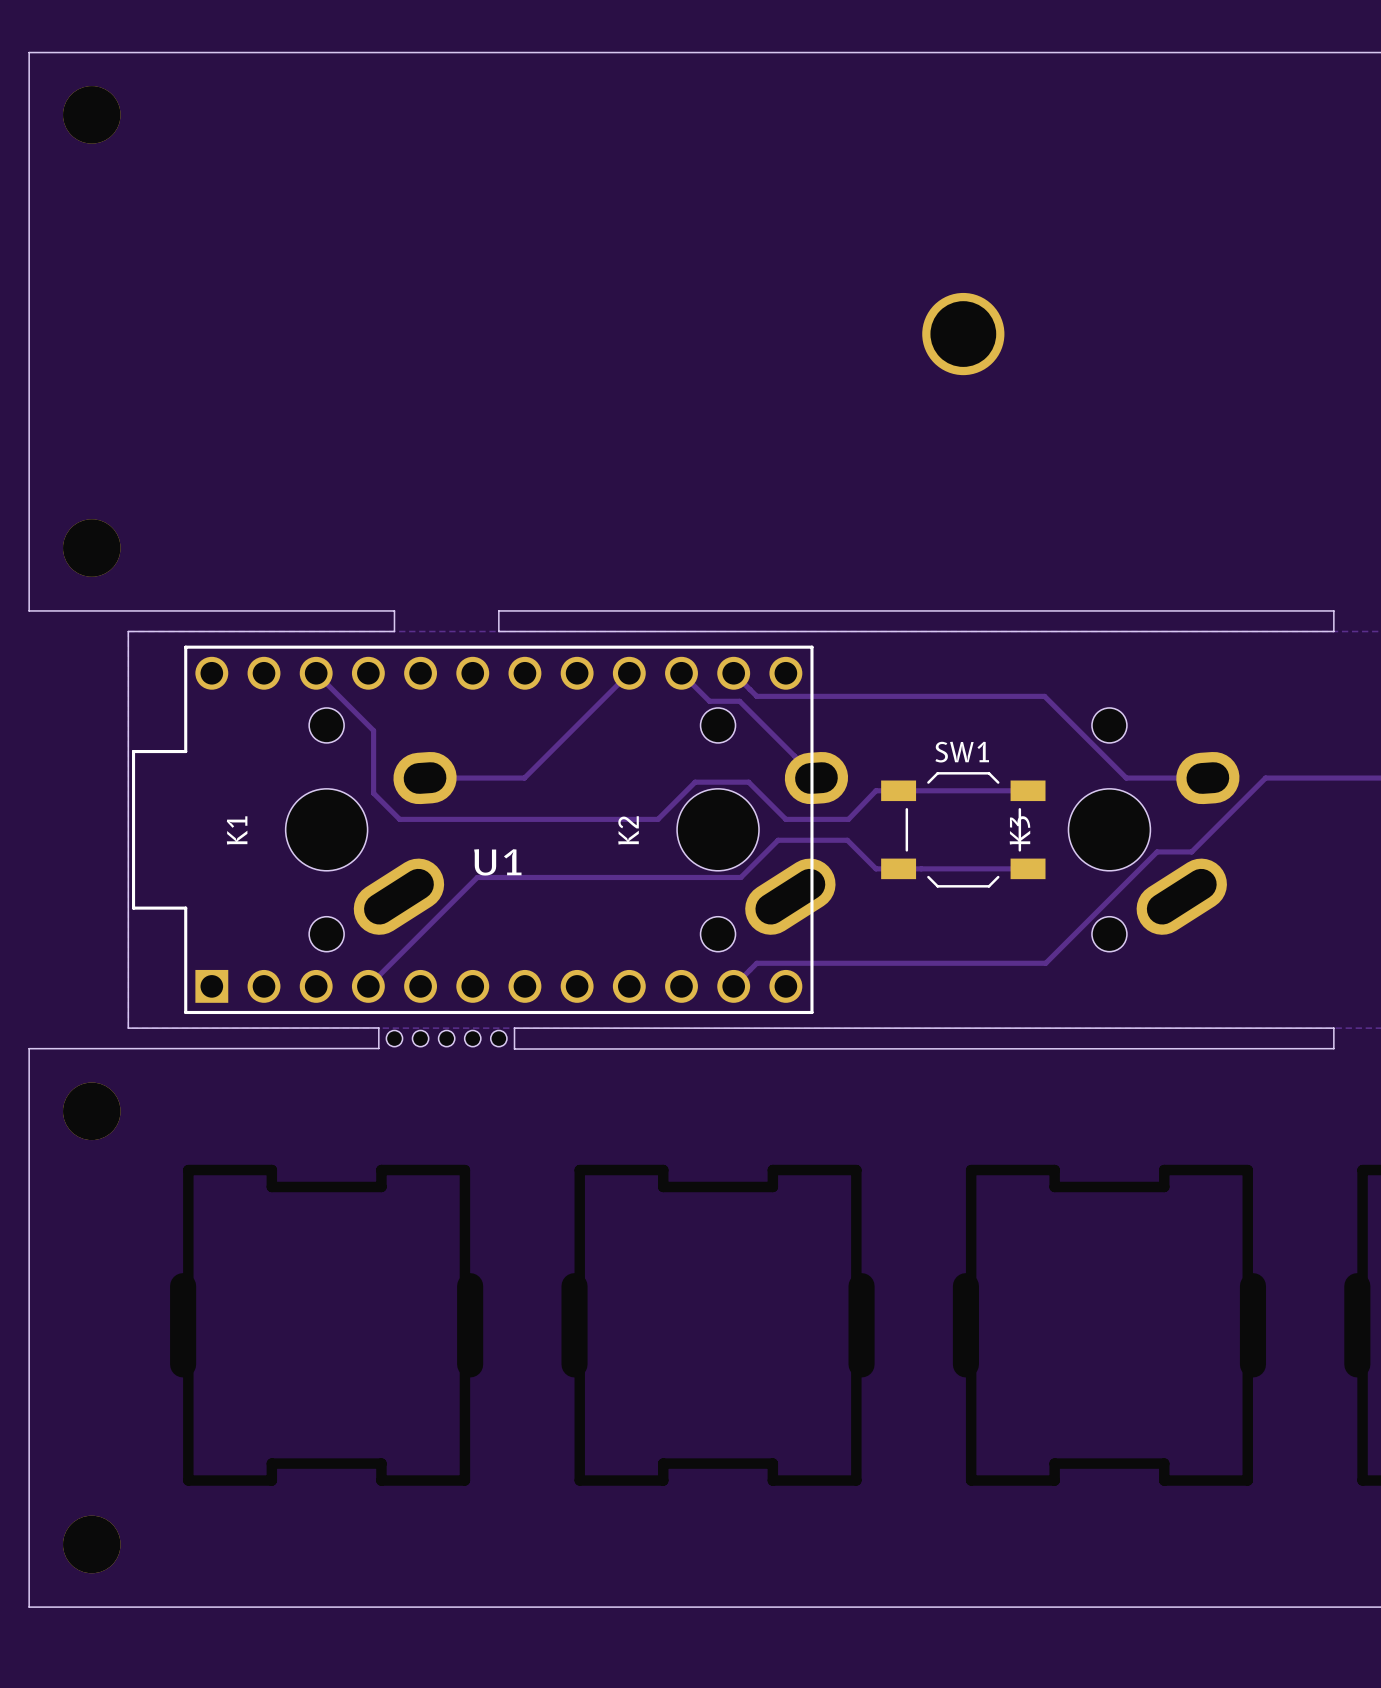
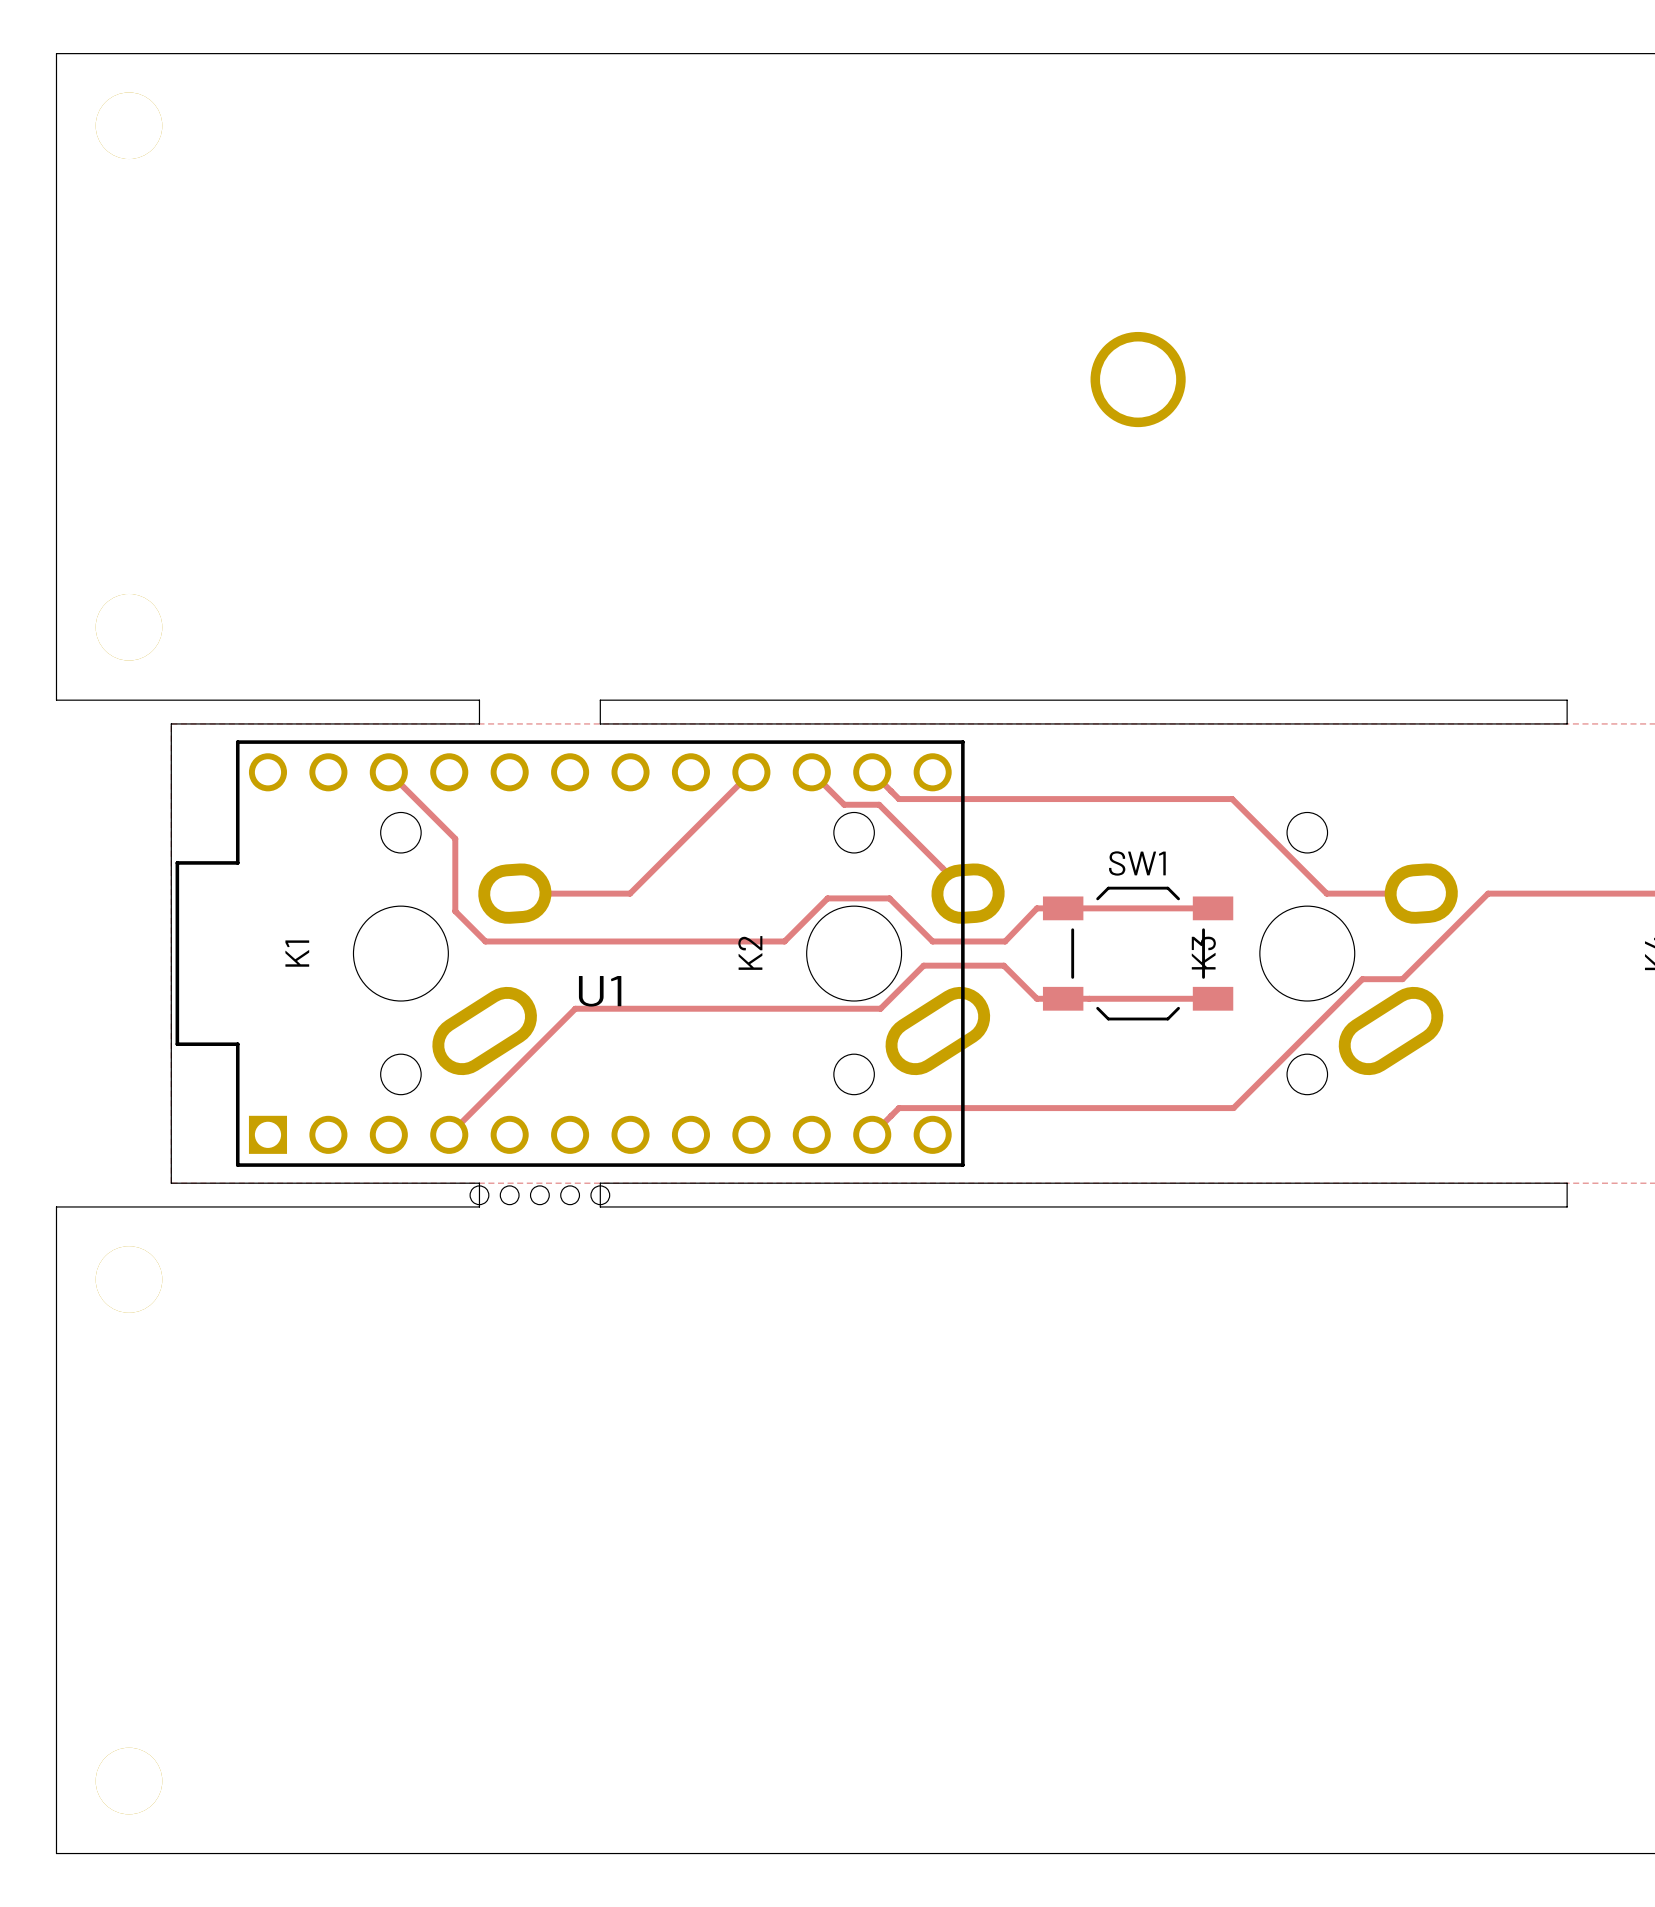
board edge: (128, 1028) (378, 1027) (378, 1048) (29, 1048) -> (171, 1183) (479, 1183) (479, 1206) (56, 1206)
board edge: (514, 1028) (514, 1049) (1333, 1048) -> (618, 1183) (600, 1183) (600, 1206) (1567, 1206)

